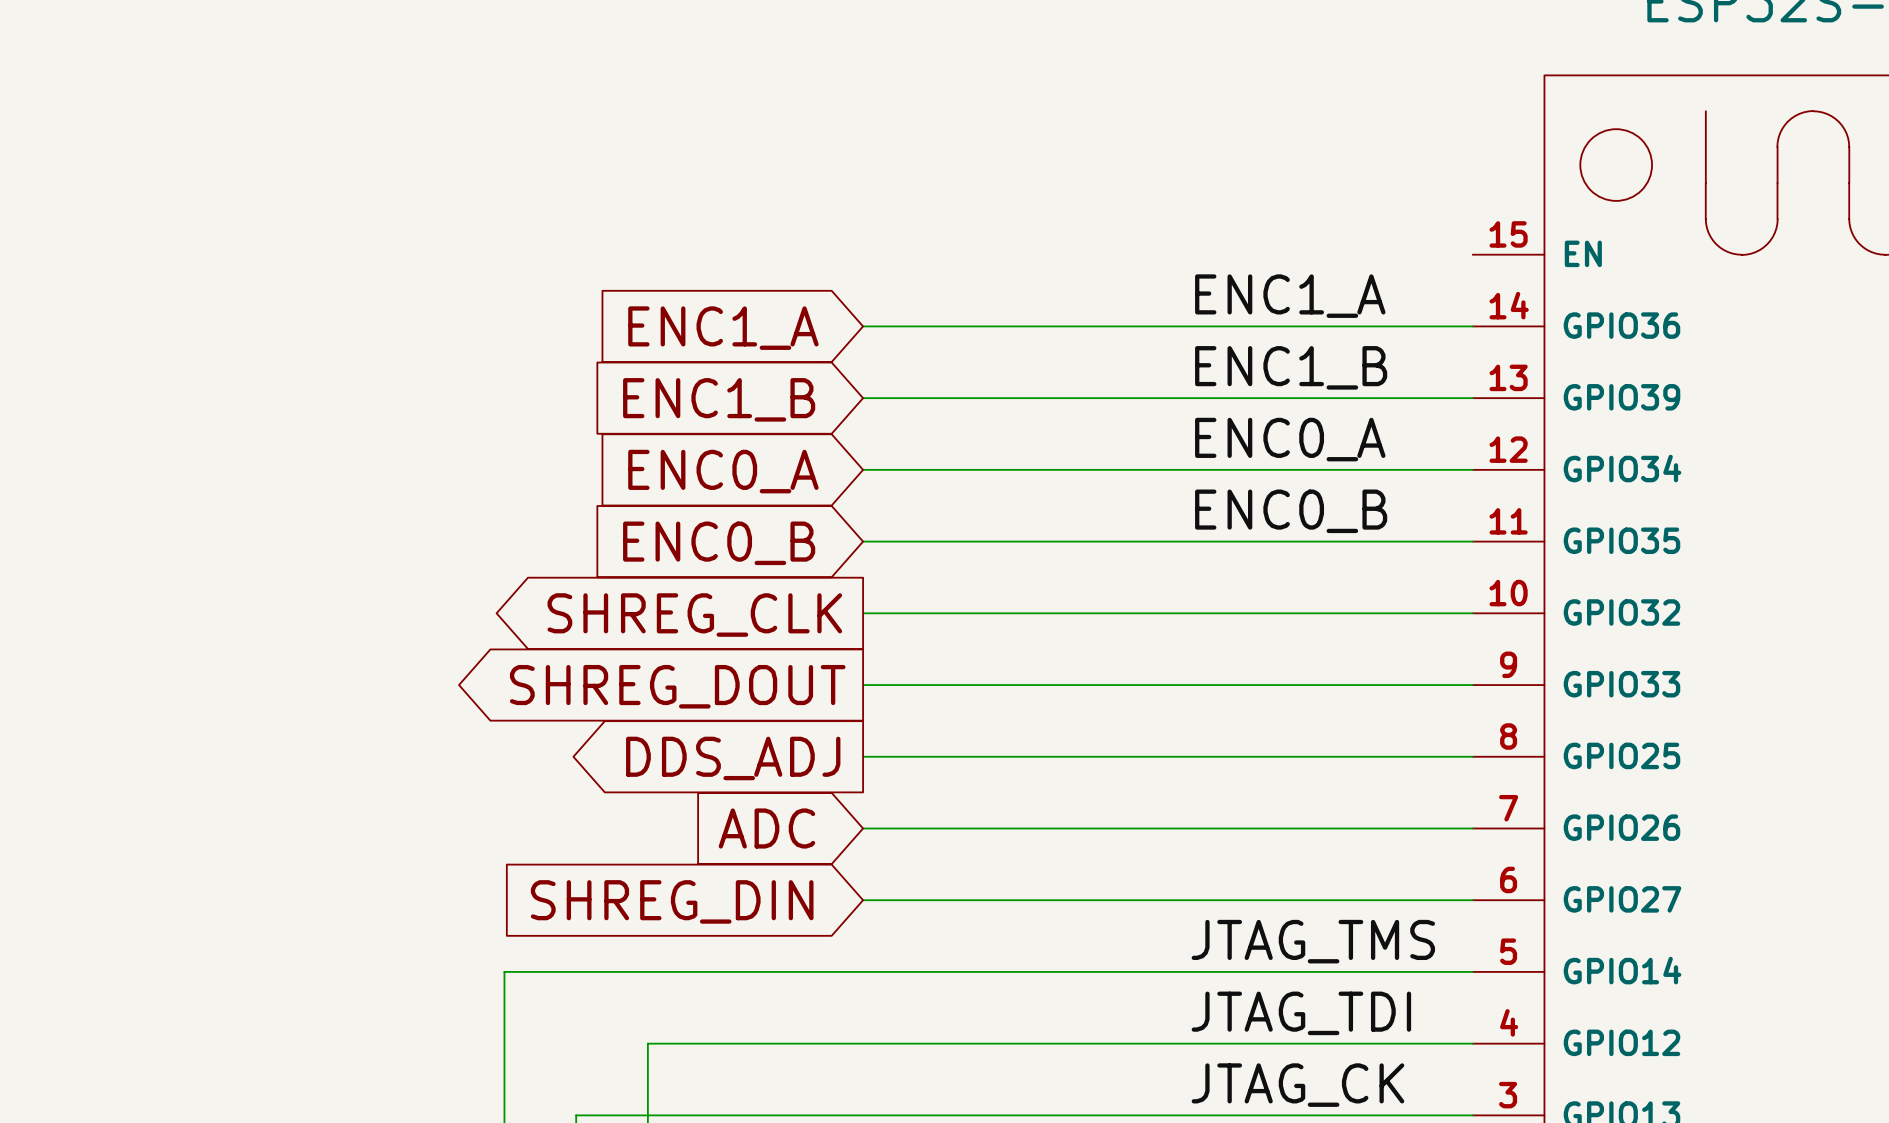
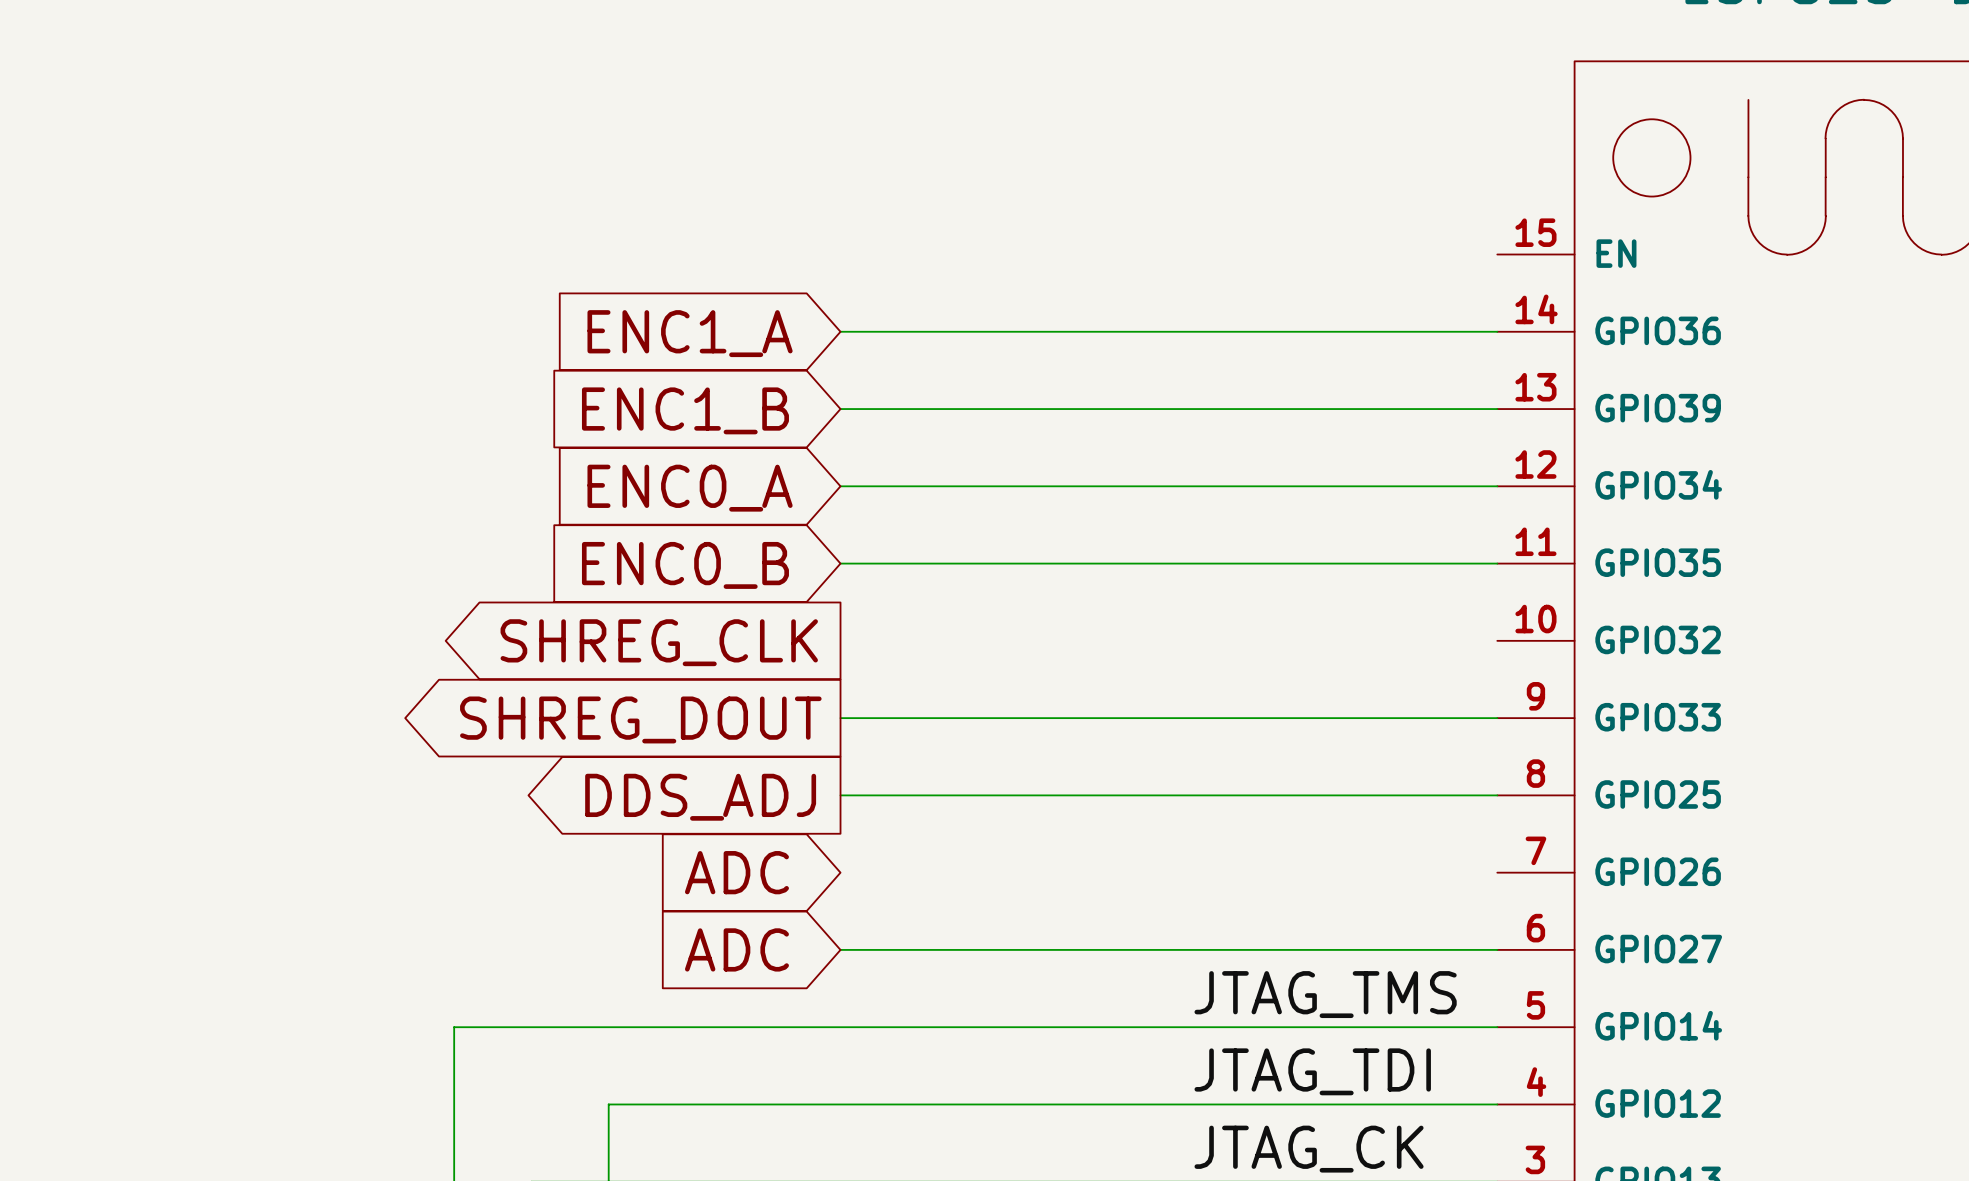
label: ENC1_A (1290, 296) -> none
label: ENC1_B (1291, 367) -> none
label: ENC0_A (1290, 439) -> none
label: ENC0_B (1291, 511) -> none
wire: (863, 613) (1472, 613) -> none
wire: (863, 828) (1472, 828) -> none
global label: SHREG_DIN (672, 901) -> ADC (736, 949)

